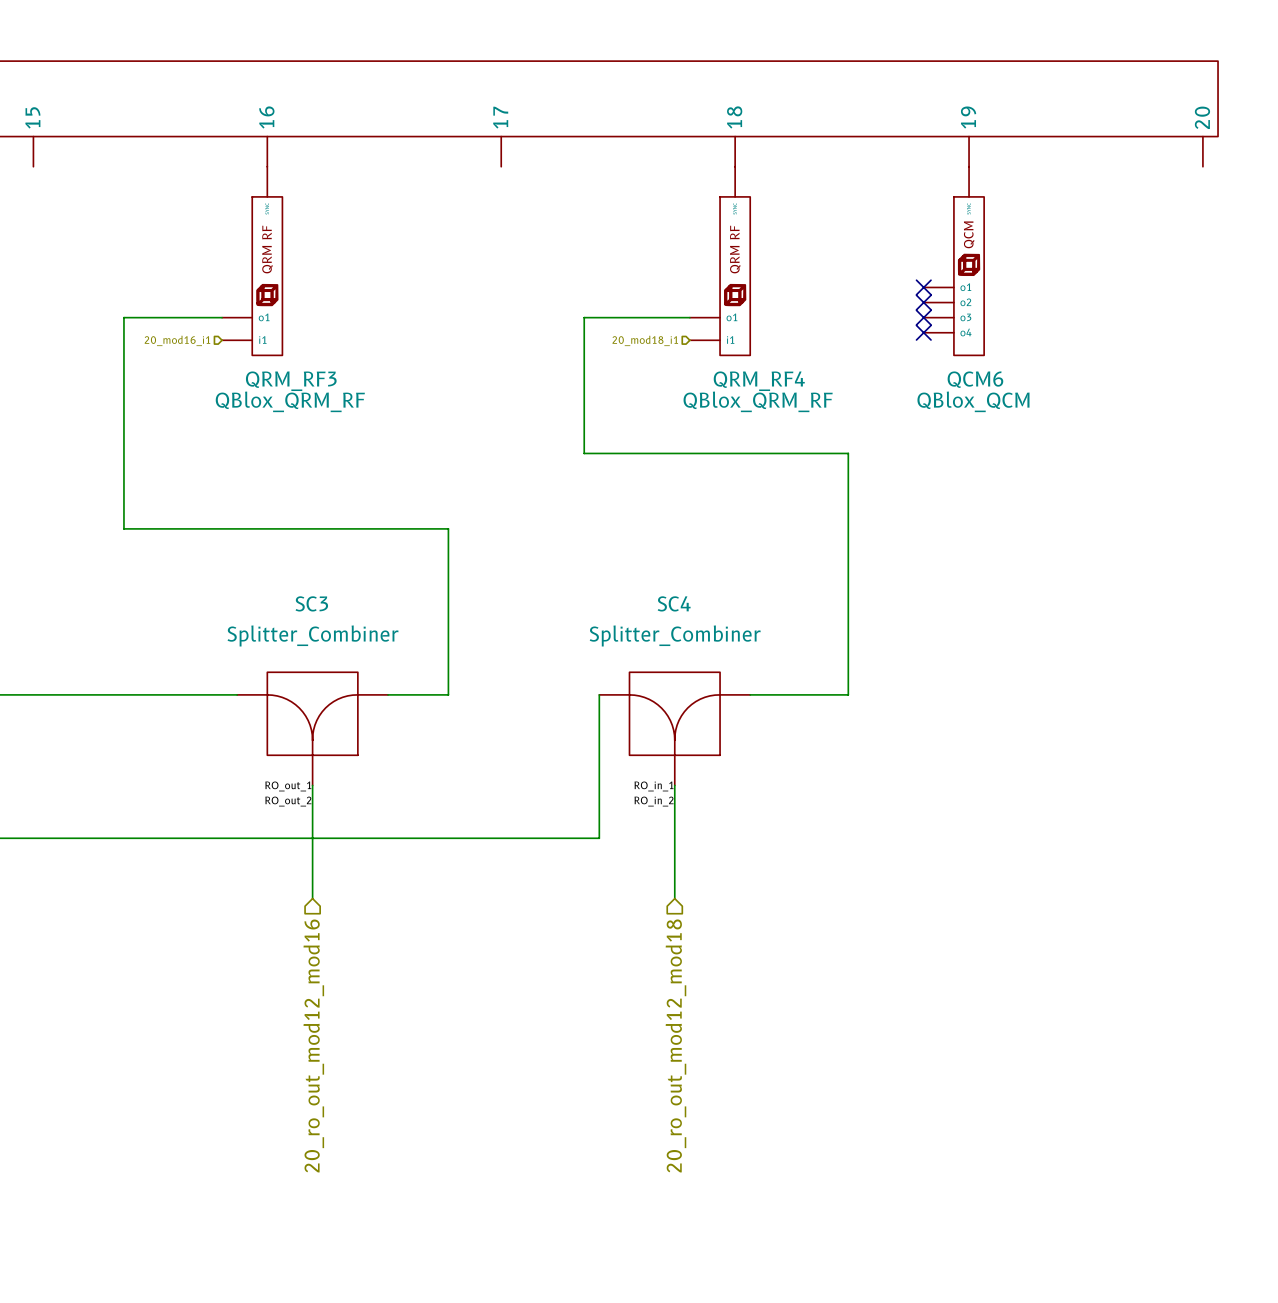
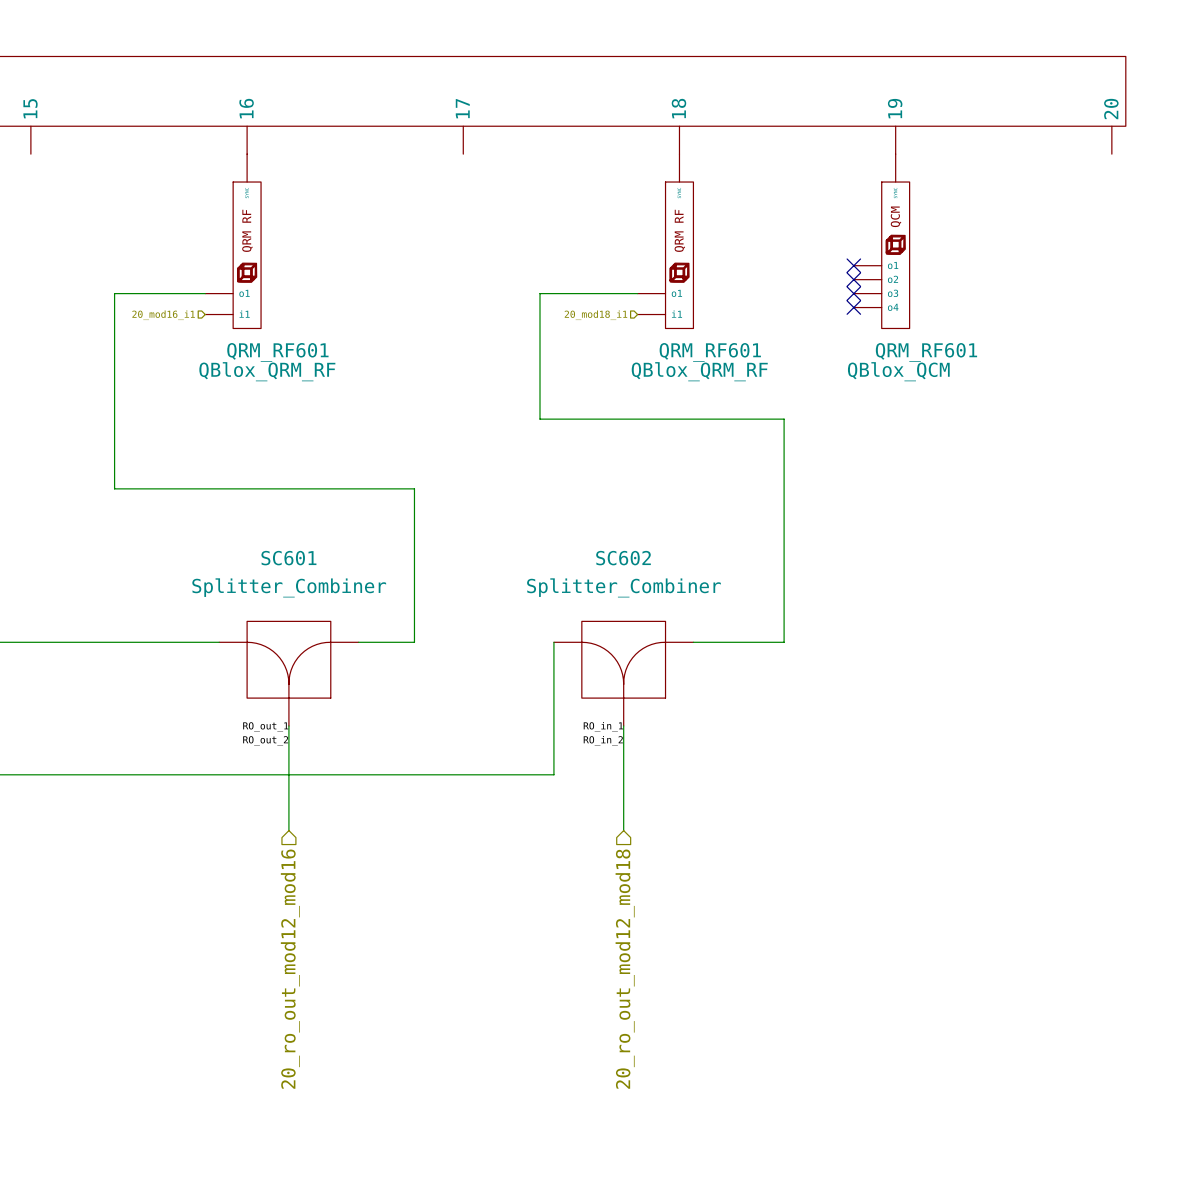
QCM6 name: QCM6 (975, 379) -> QRM_RF601 (926, 352)
QRM_RF3 name: QRM_RF3 (291, 381) -> QRM_RF601 (277, 352)
QRM_RF4 name: QRM_RF4 (759, 381) -> QRM_RF601 (710, 352)
SC3 name: SC3 (311, 603) -> SC601 (288, 558)
SC4 name: SC4 (674, 603) -> SC602 (623, 558)

